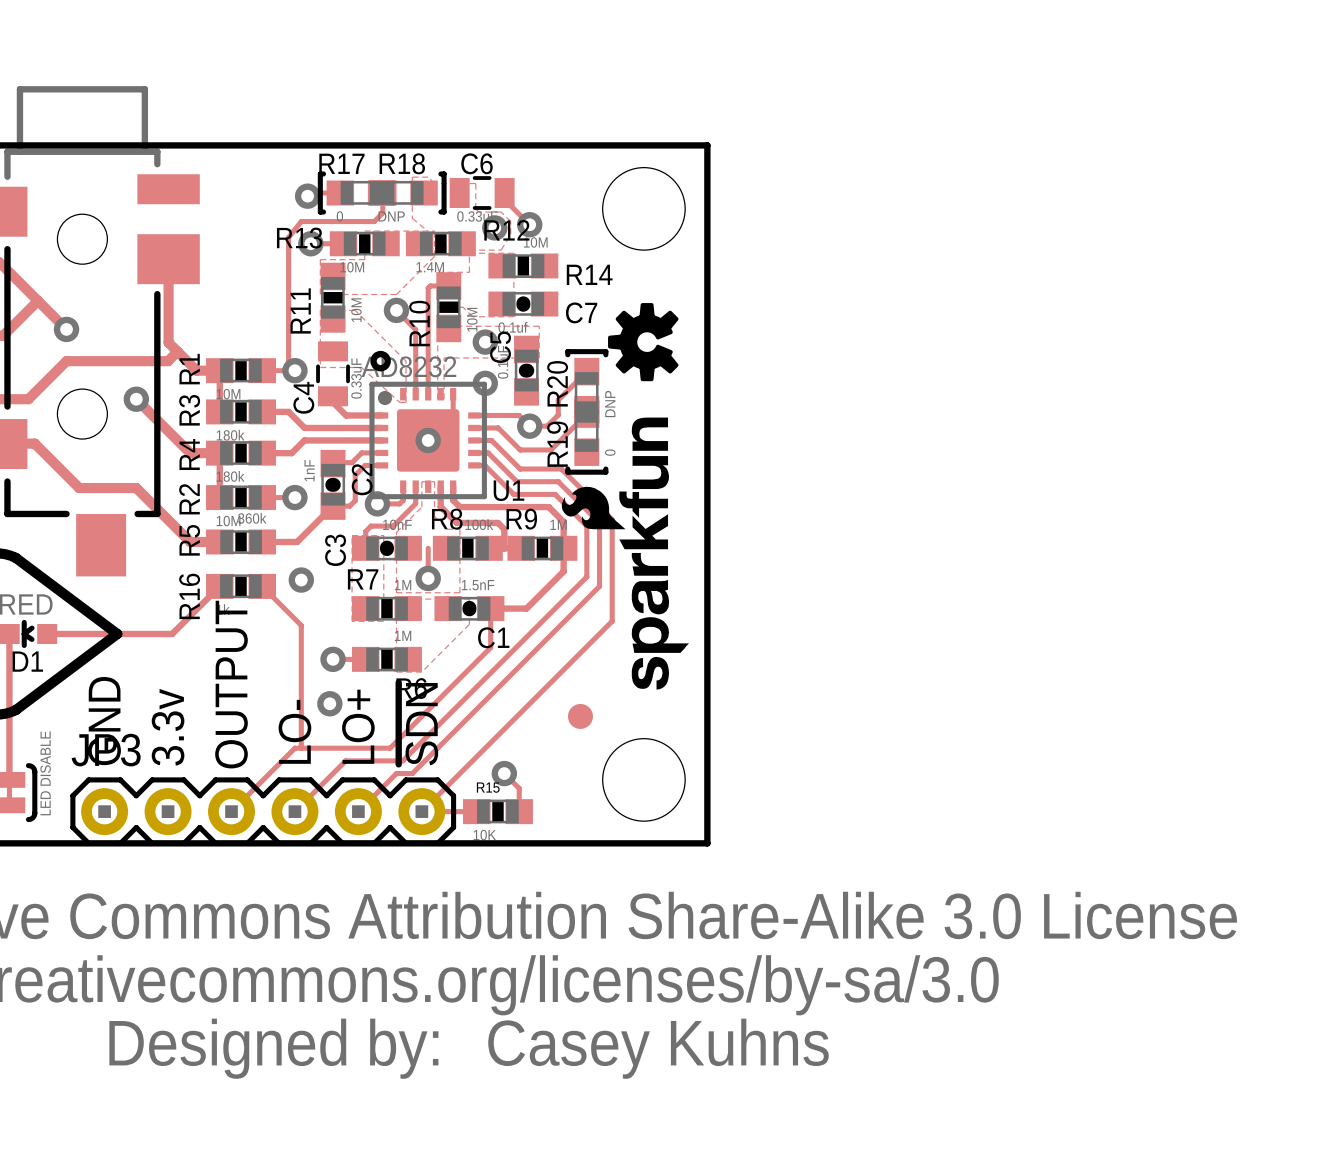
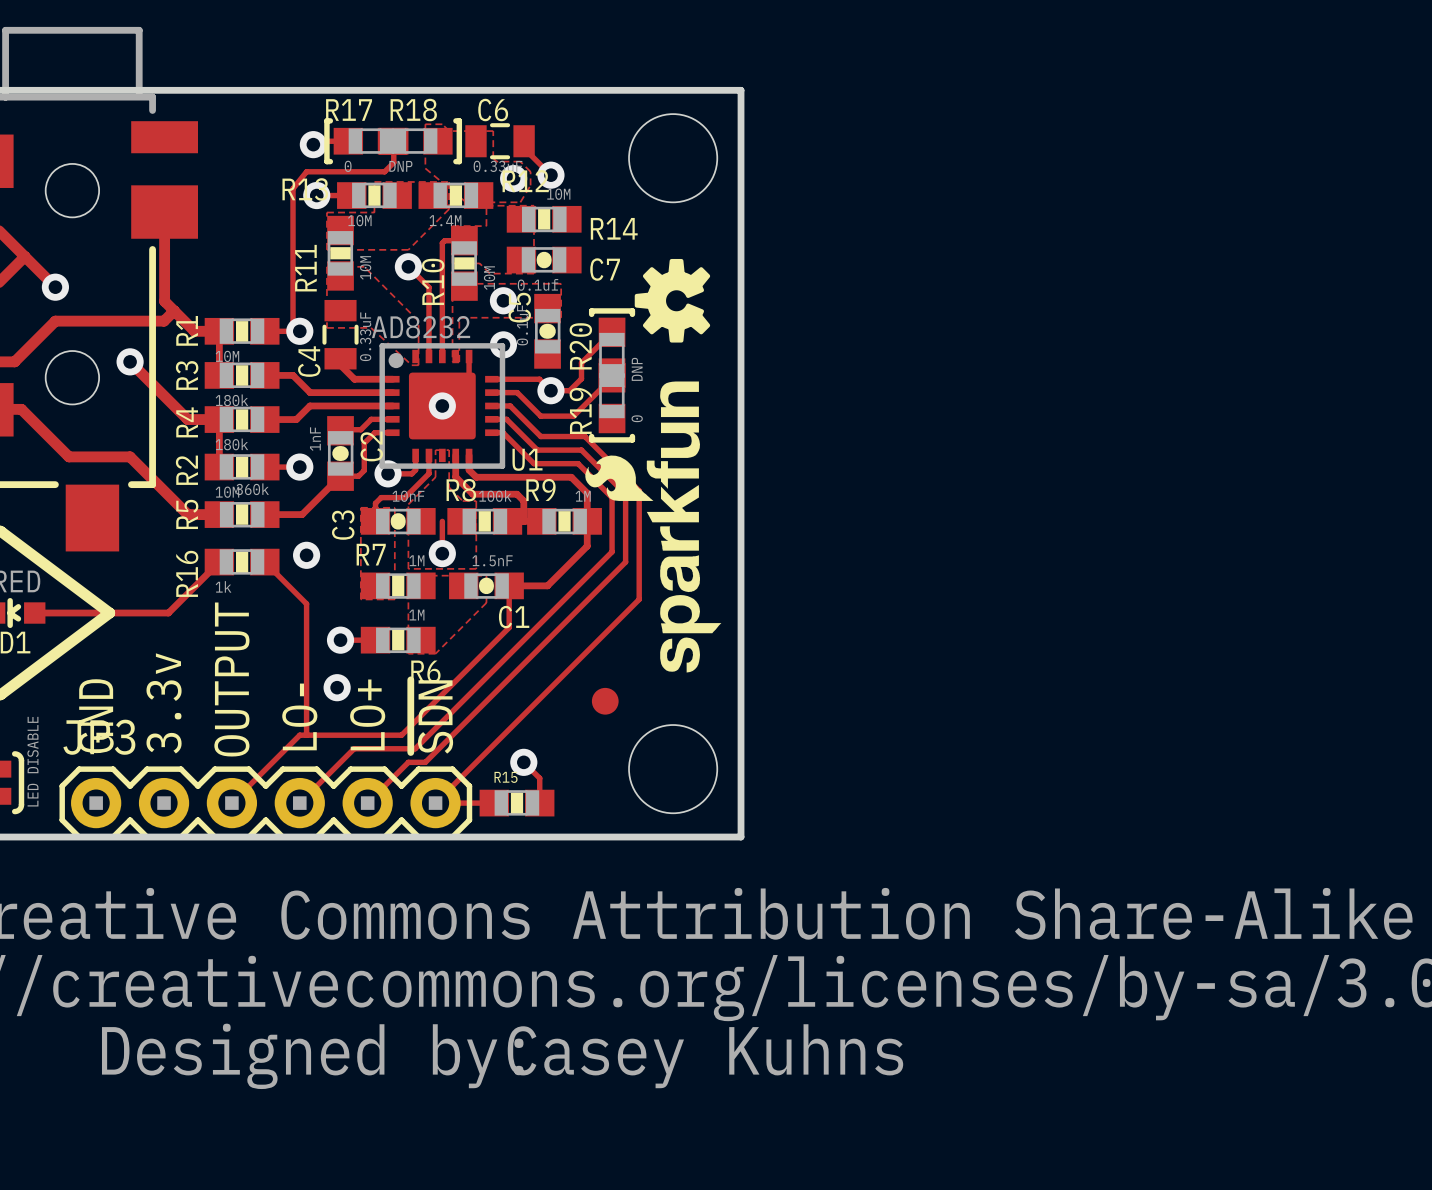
drawing: [370, 350, 391, 372] -> none
R15 value: 10K (484, 835) -> none

